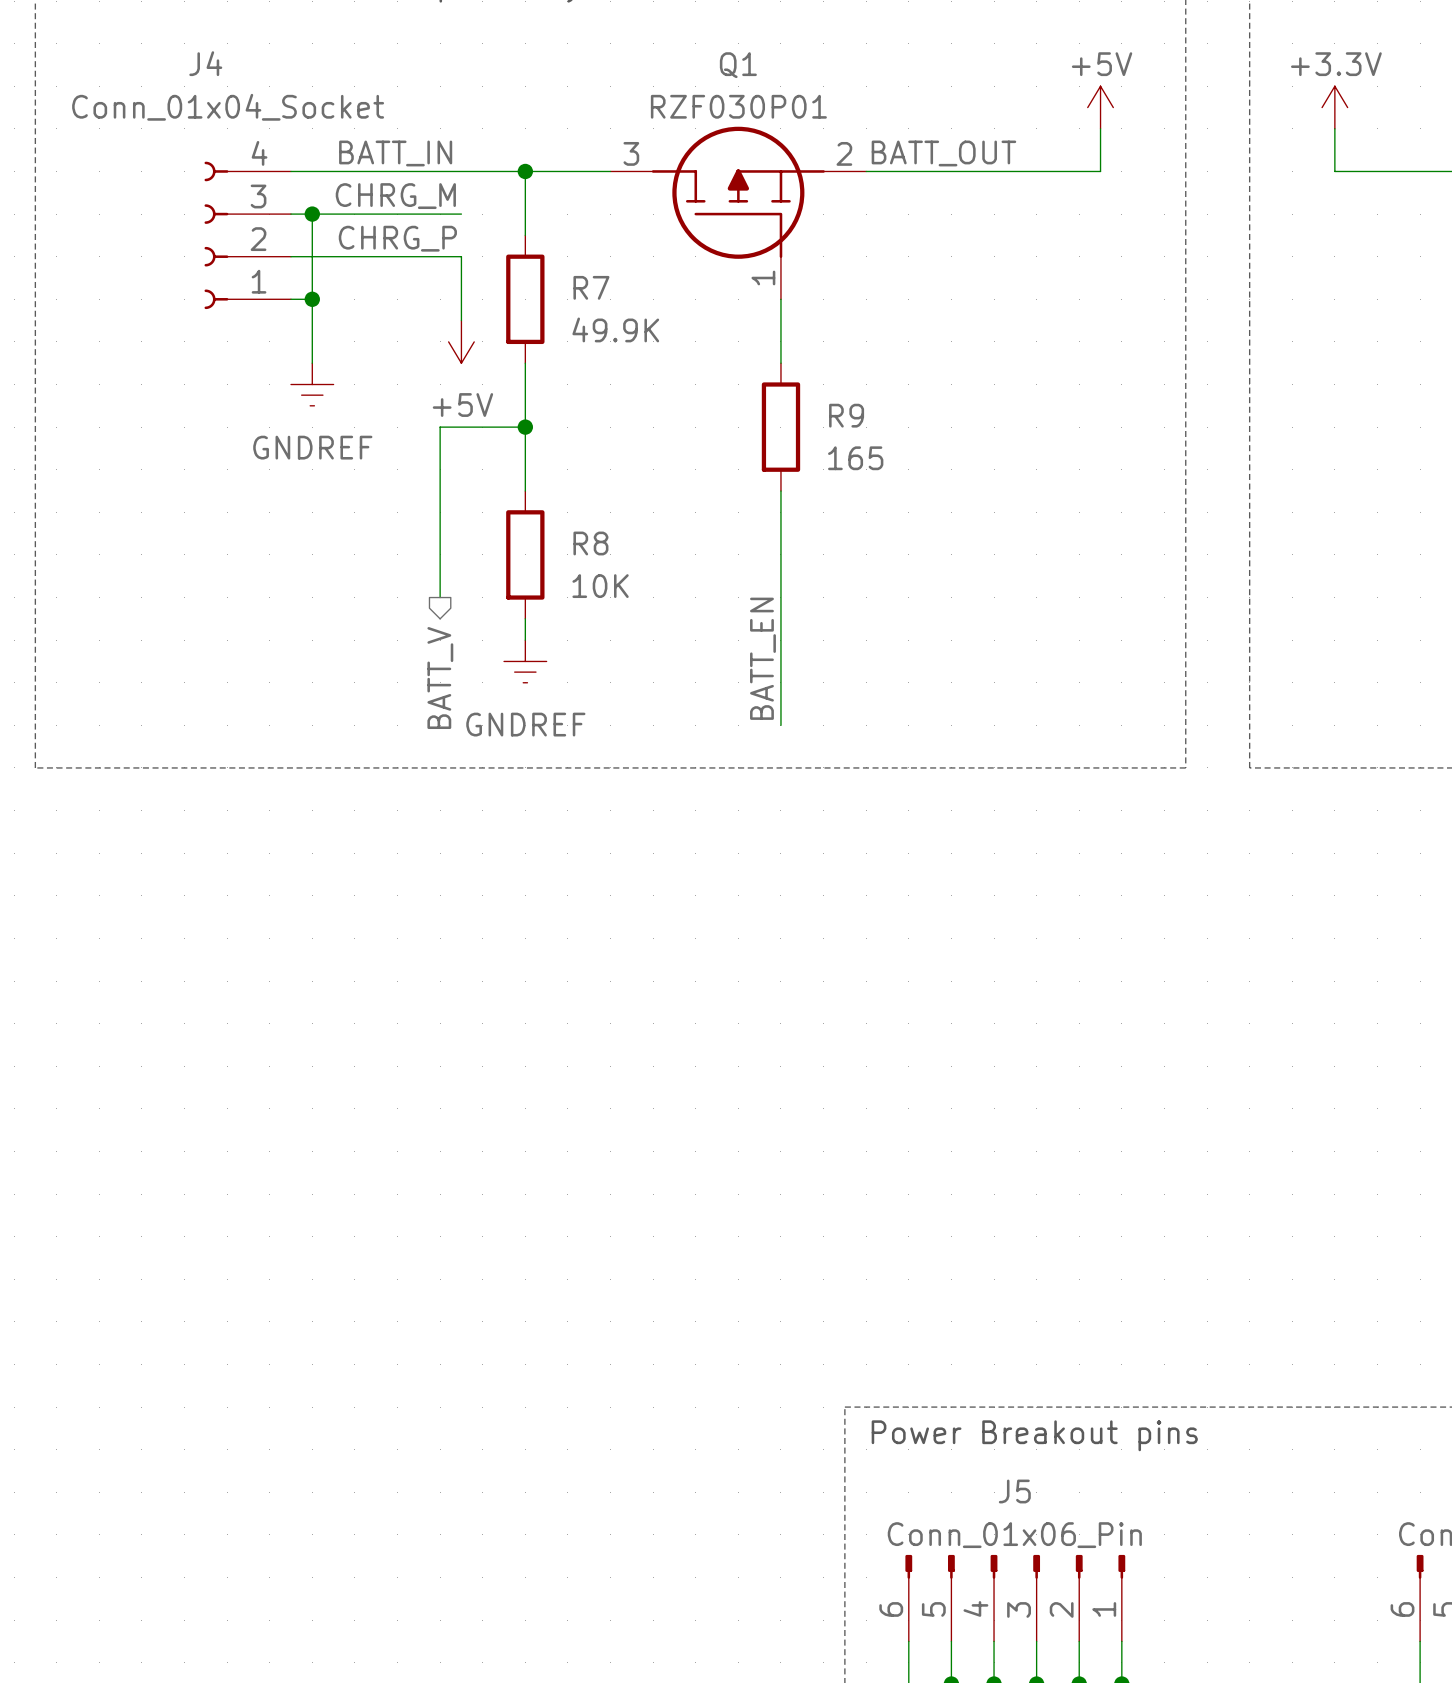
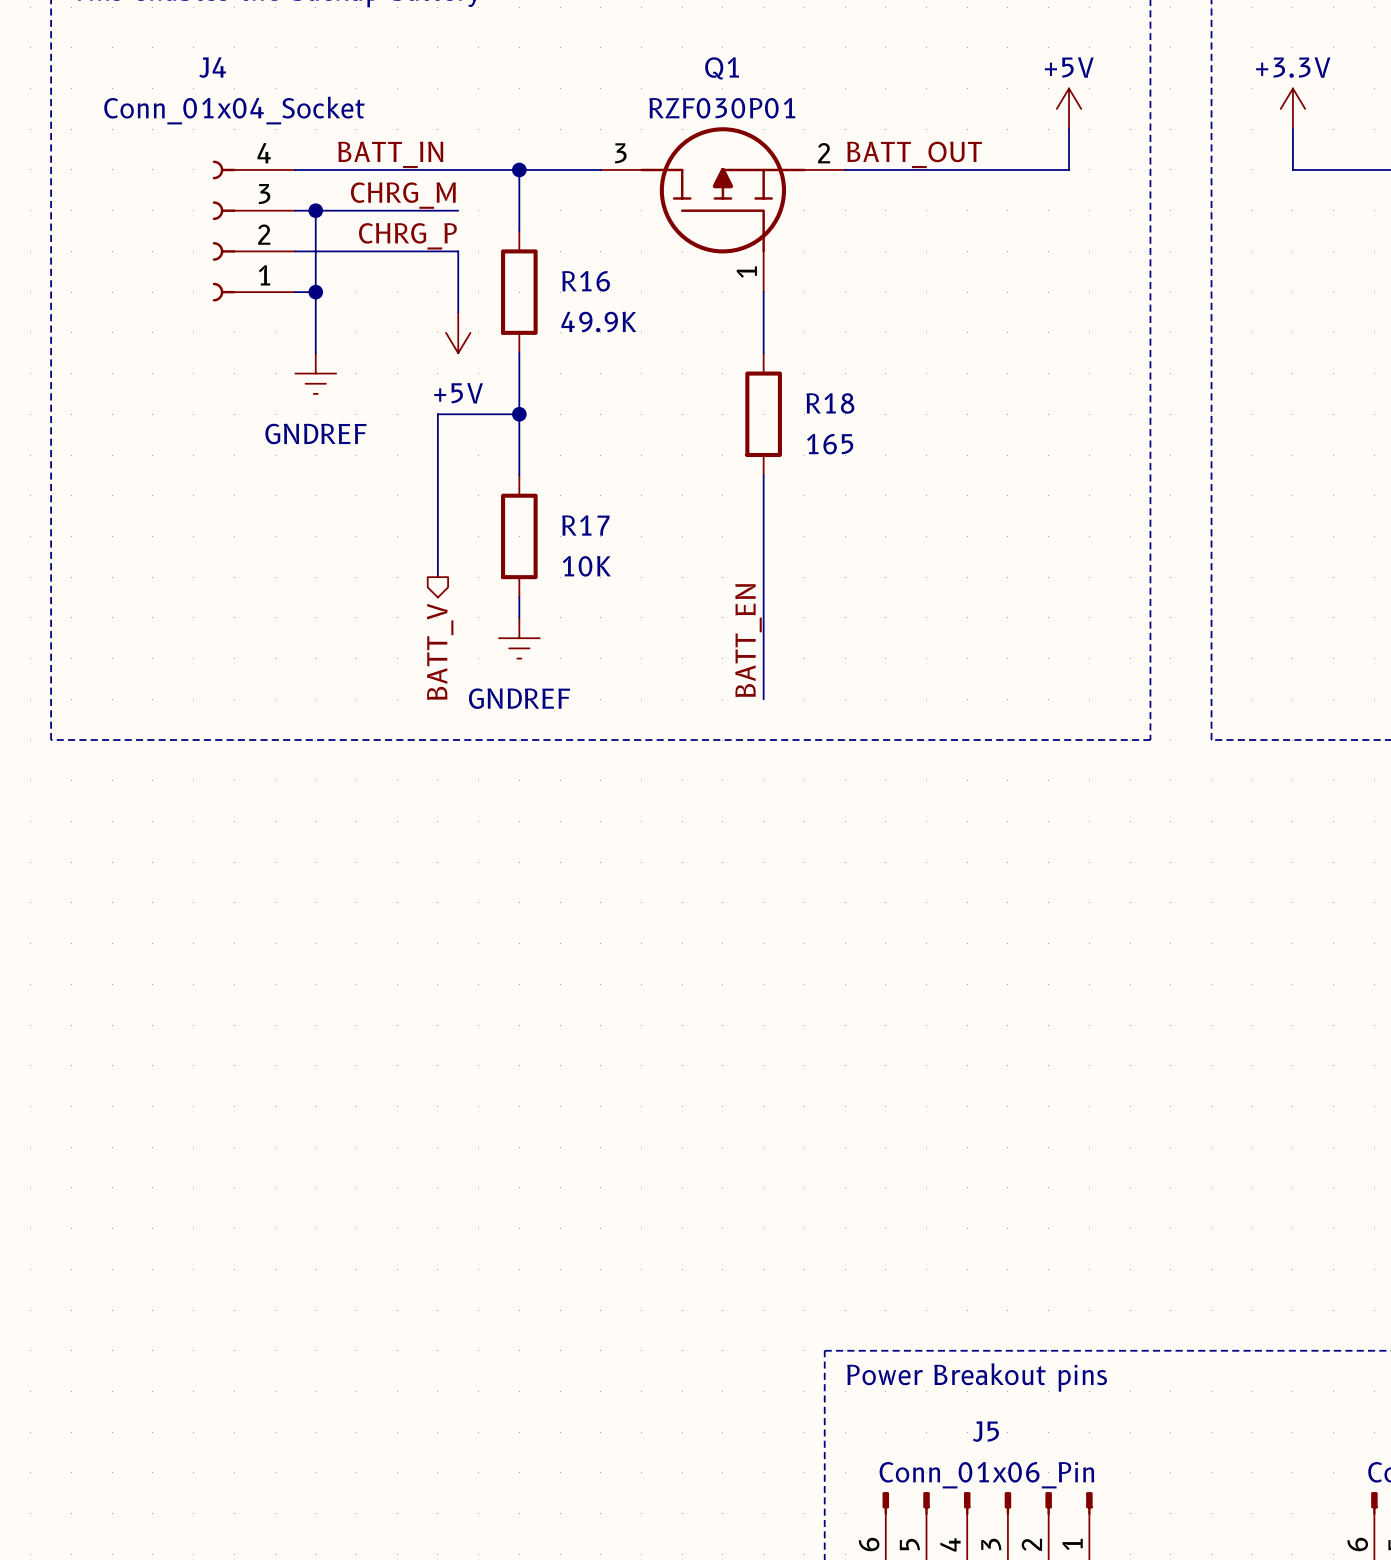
R7 name: R7 (591, 287) -> R16 (586, 281)
R9 name: R9 (846, 415) -> R18 (830, 403)
R8 name: R8 (590, 543) -> R17 (585, 525)

